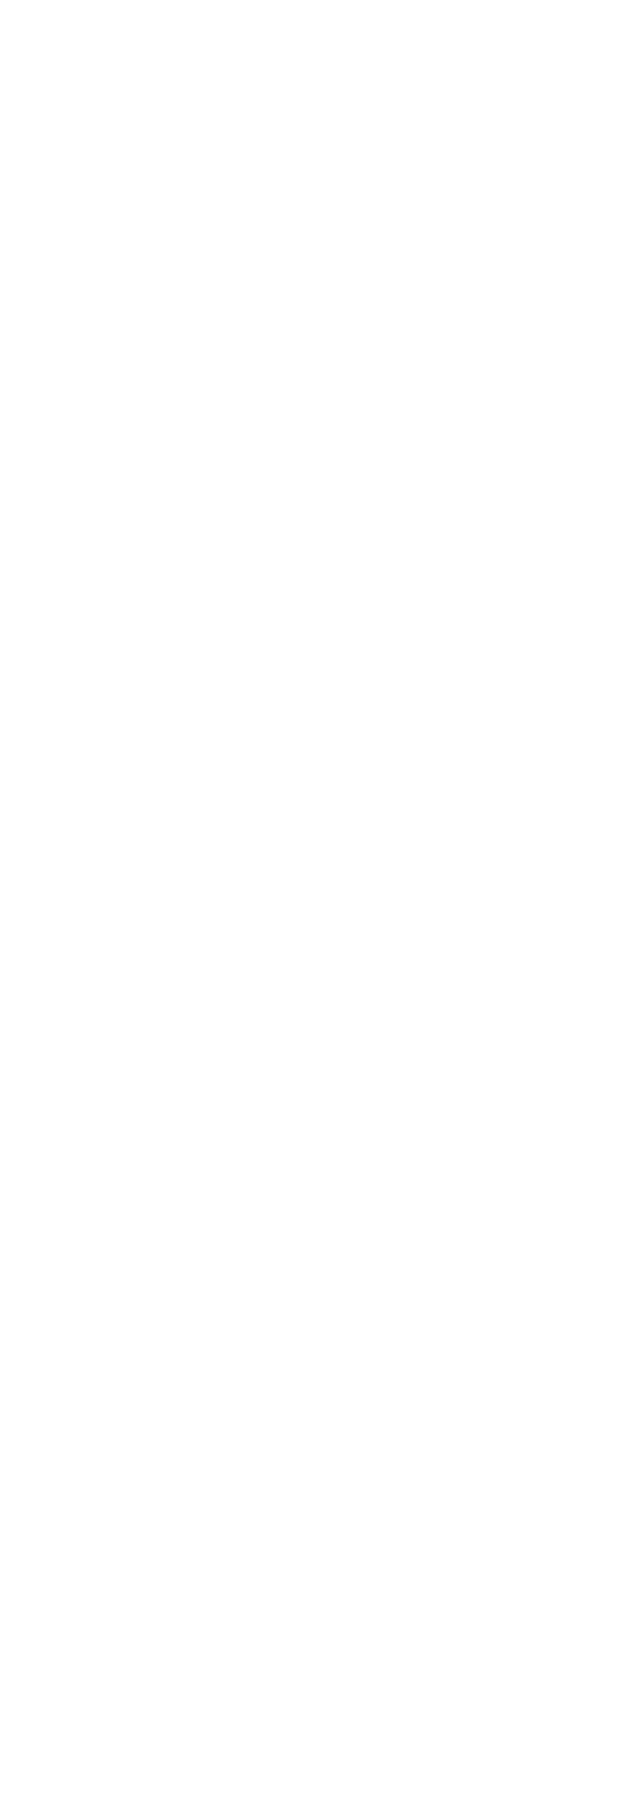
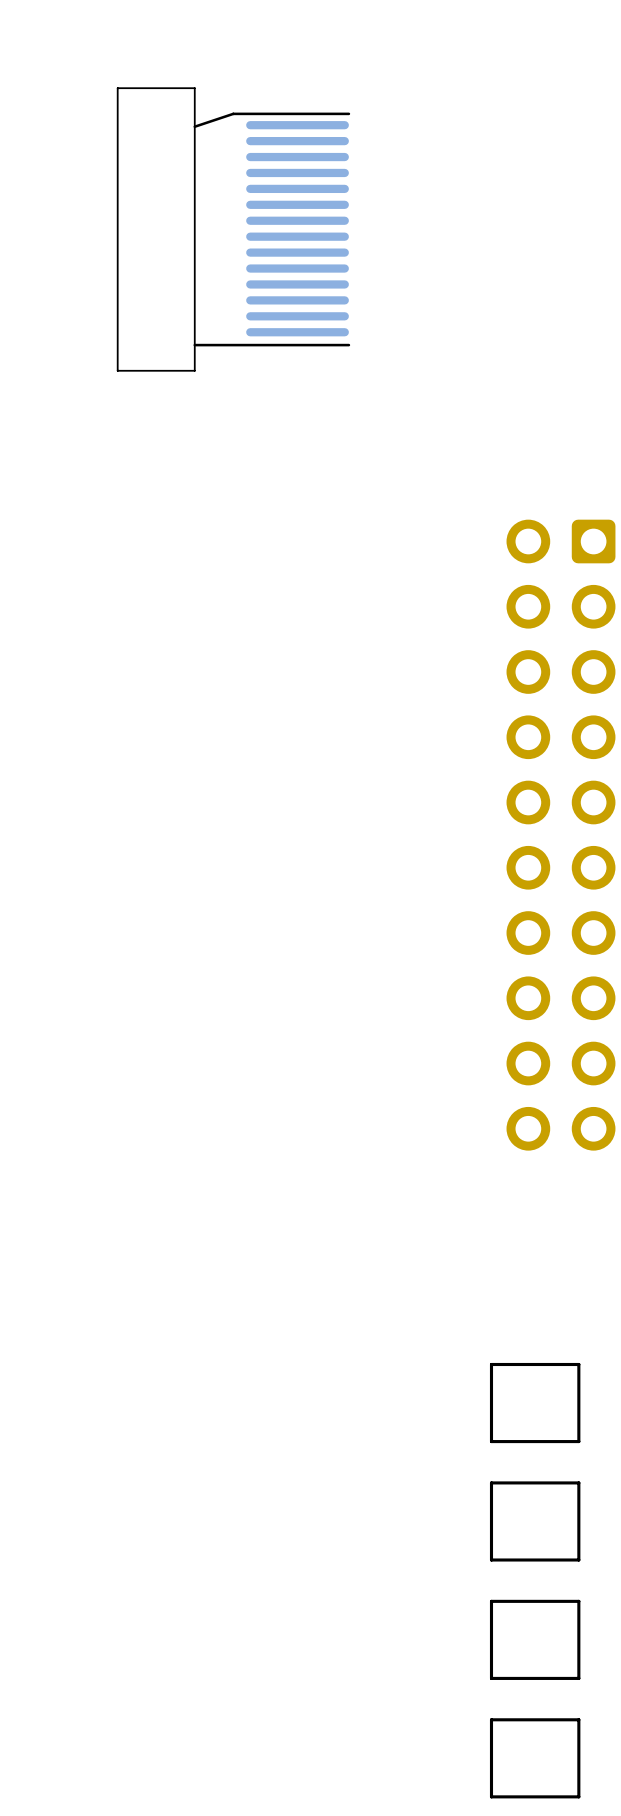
part: none -> (233, 229)
part: none -> (560, 835)
part: none -> (535, 1403)
part: none -> (535, 1521)
part: none -> (535, 1639)
part: none -> (535, 1758)

